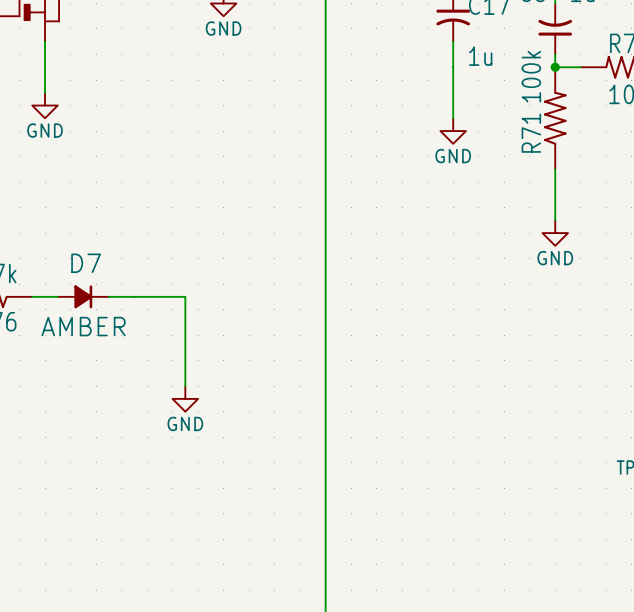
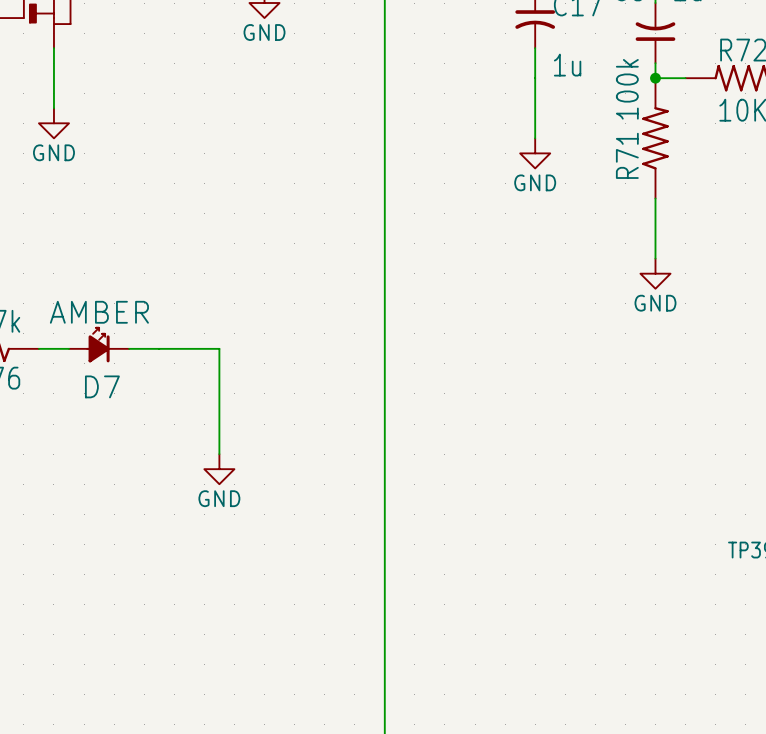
D7 name position: D7 (86, 263) -> D7 (102, 386)
D7 symbol: [57, 285, 109, 309] -> [69, 327, 130, 363]
D7 value position: AMBER (83, 326) -> AMBER (99, 312)

